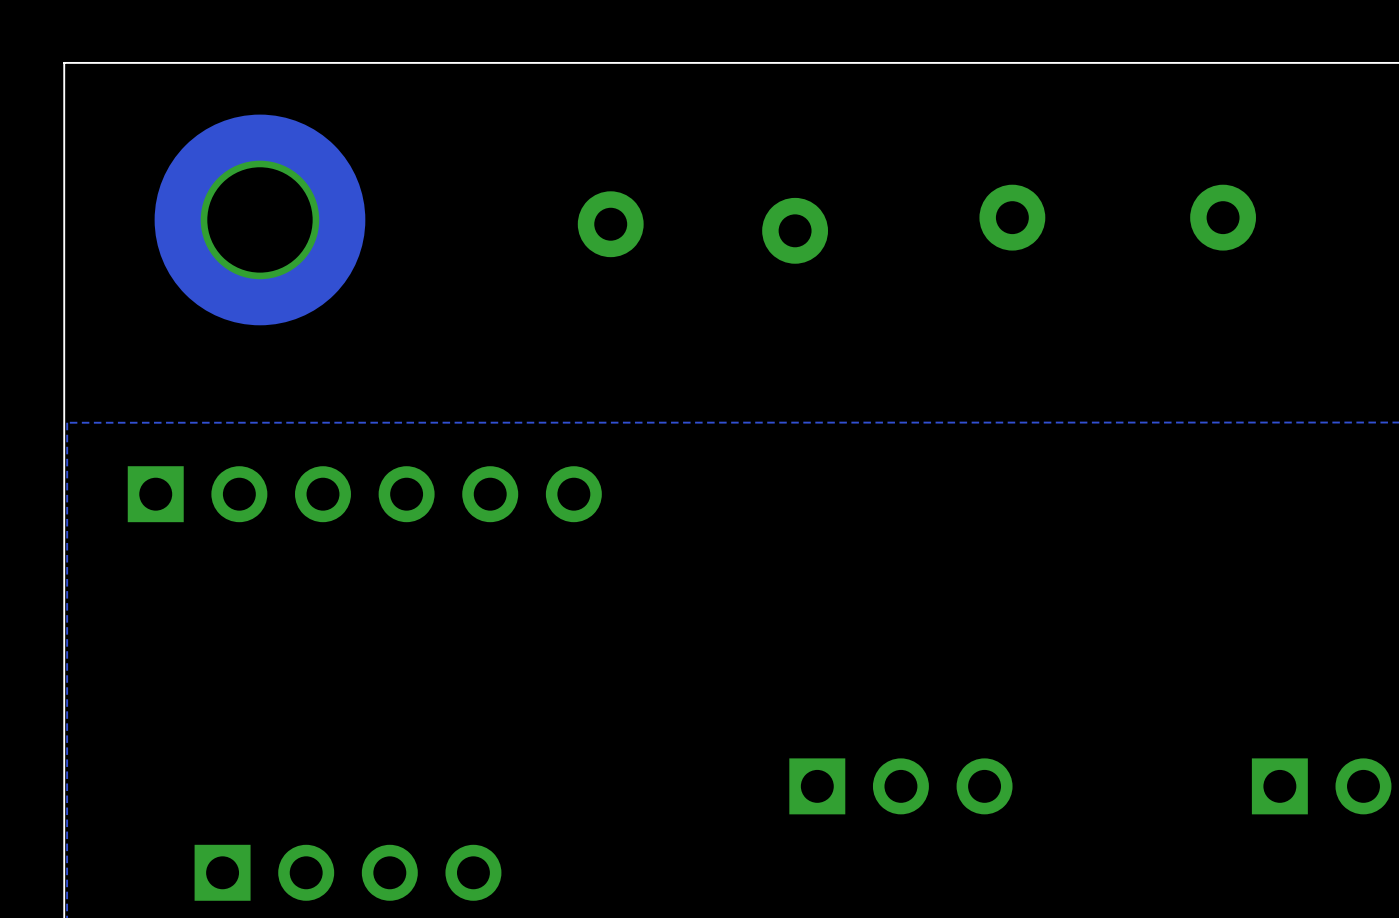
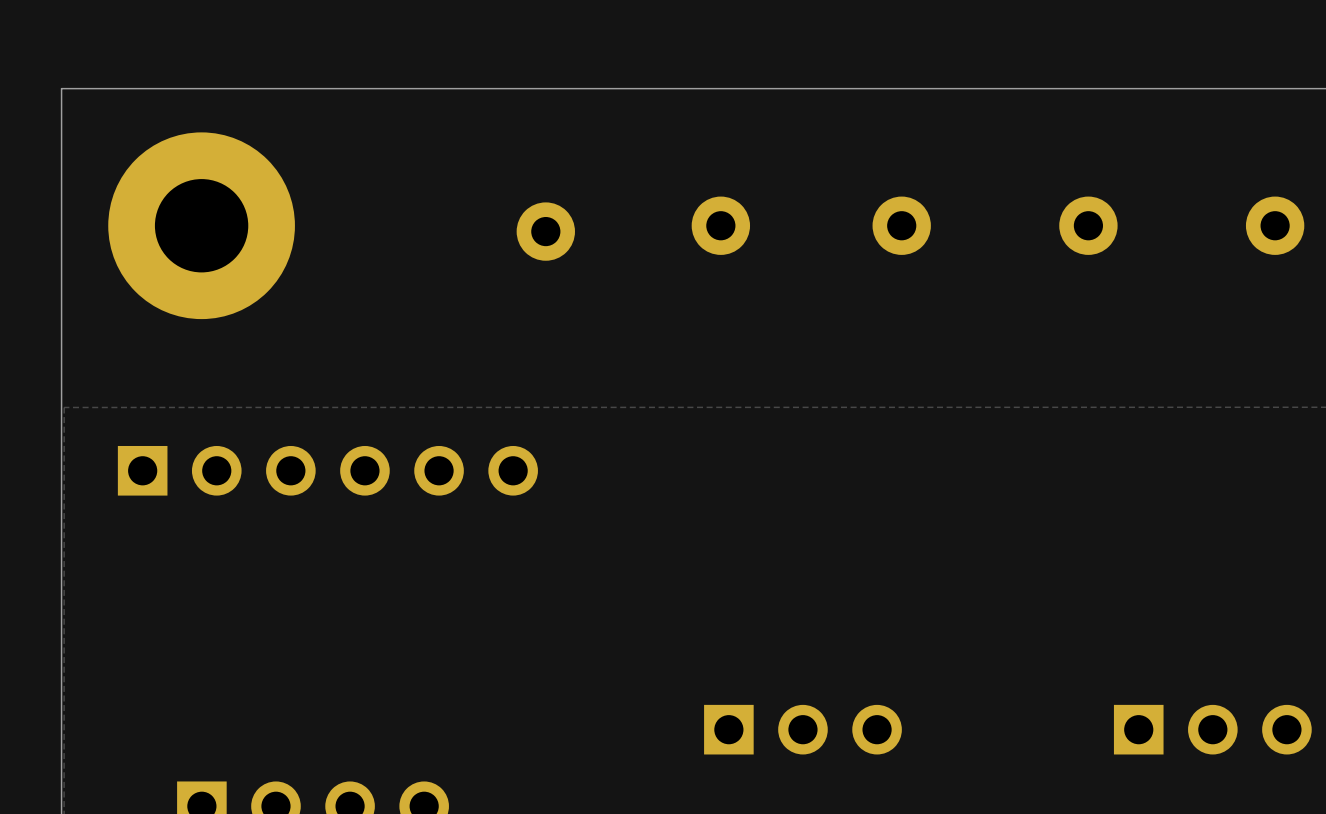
part position: (259, 219) -> (201, 225)
part position: (795, 230) -> (720, 225)

